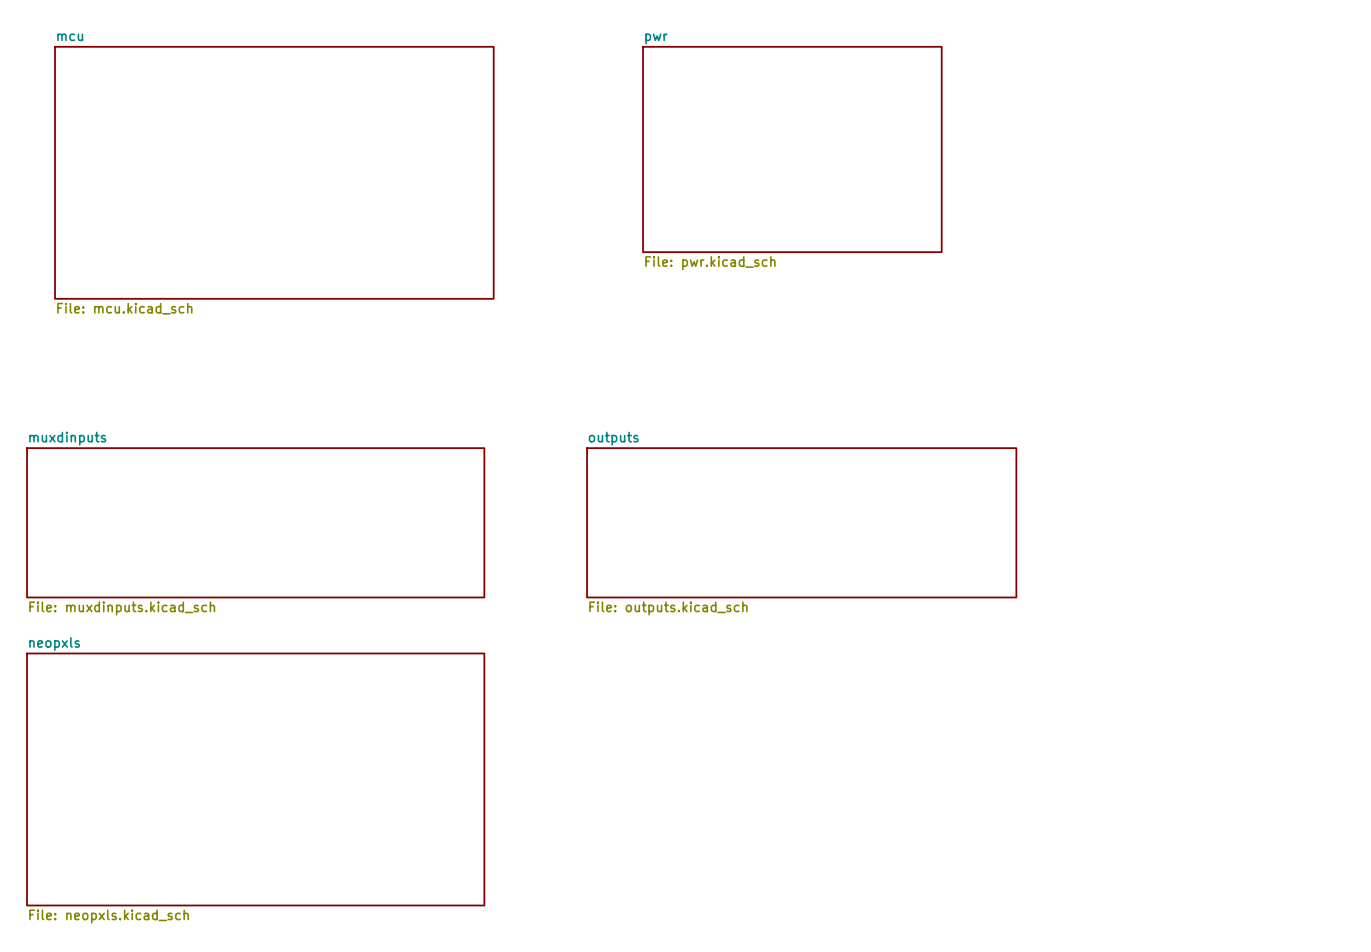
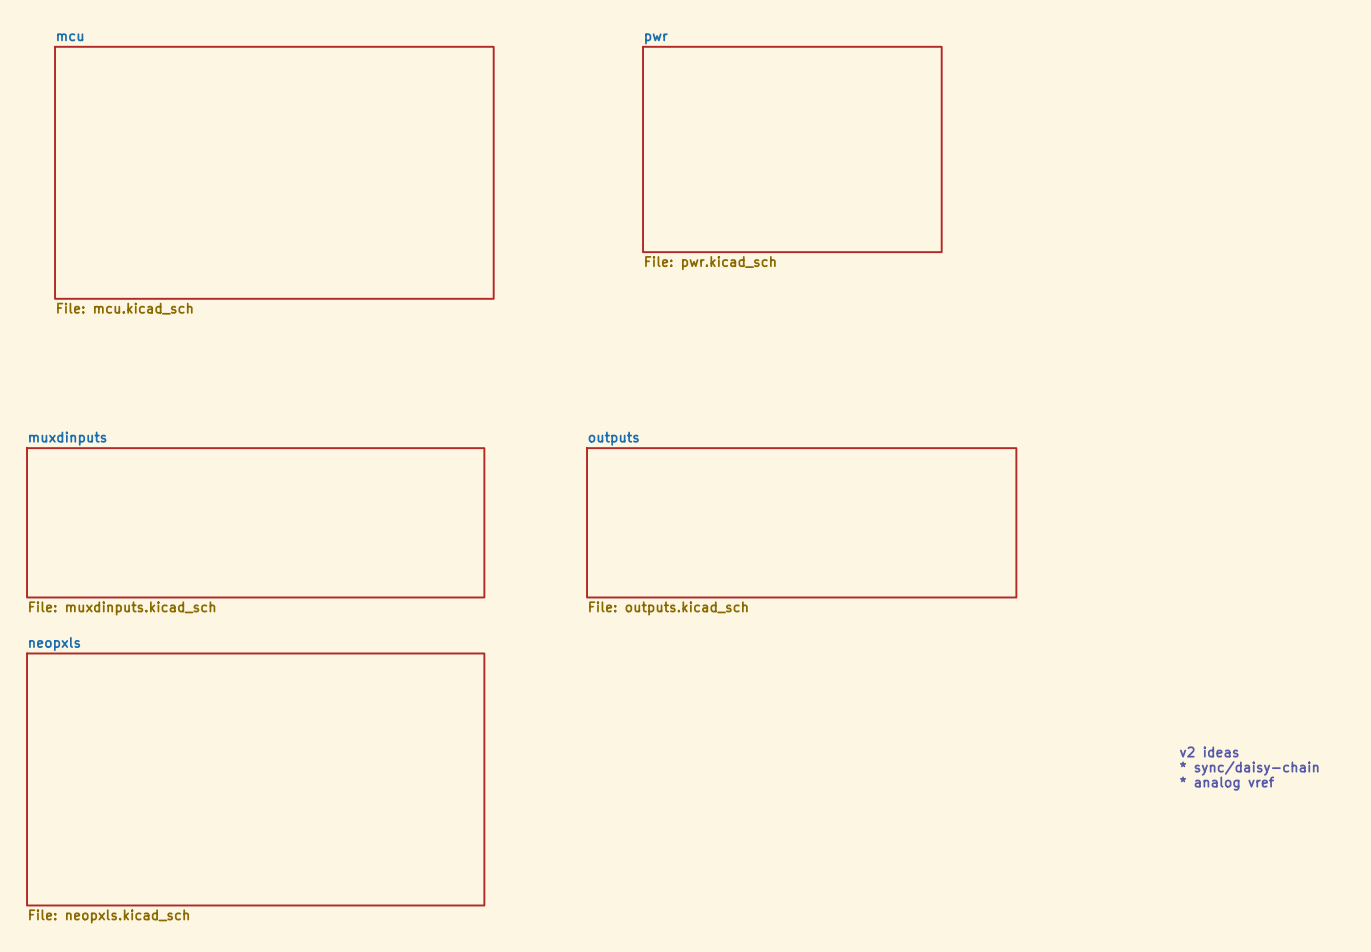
text: none -> v2 ideas (1209, 752)
text: none -> * sync/daisy-chain (1249, 768)
text: none -> * analog vref (1227, 783)

